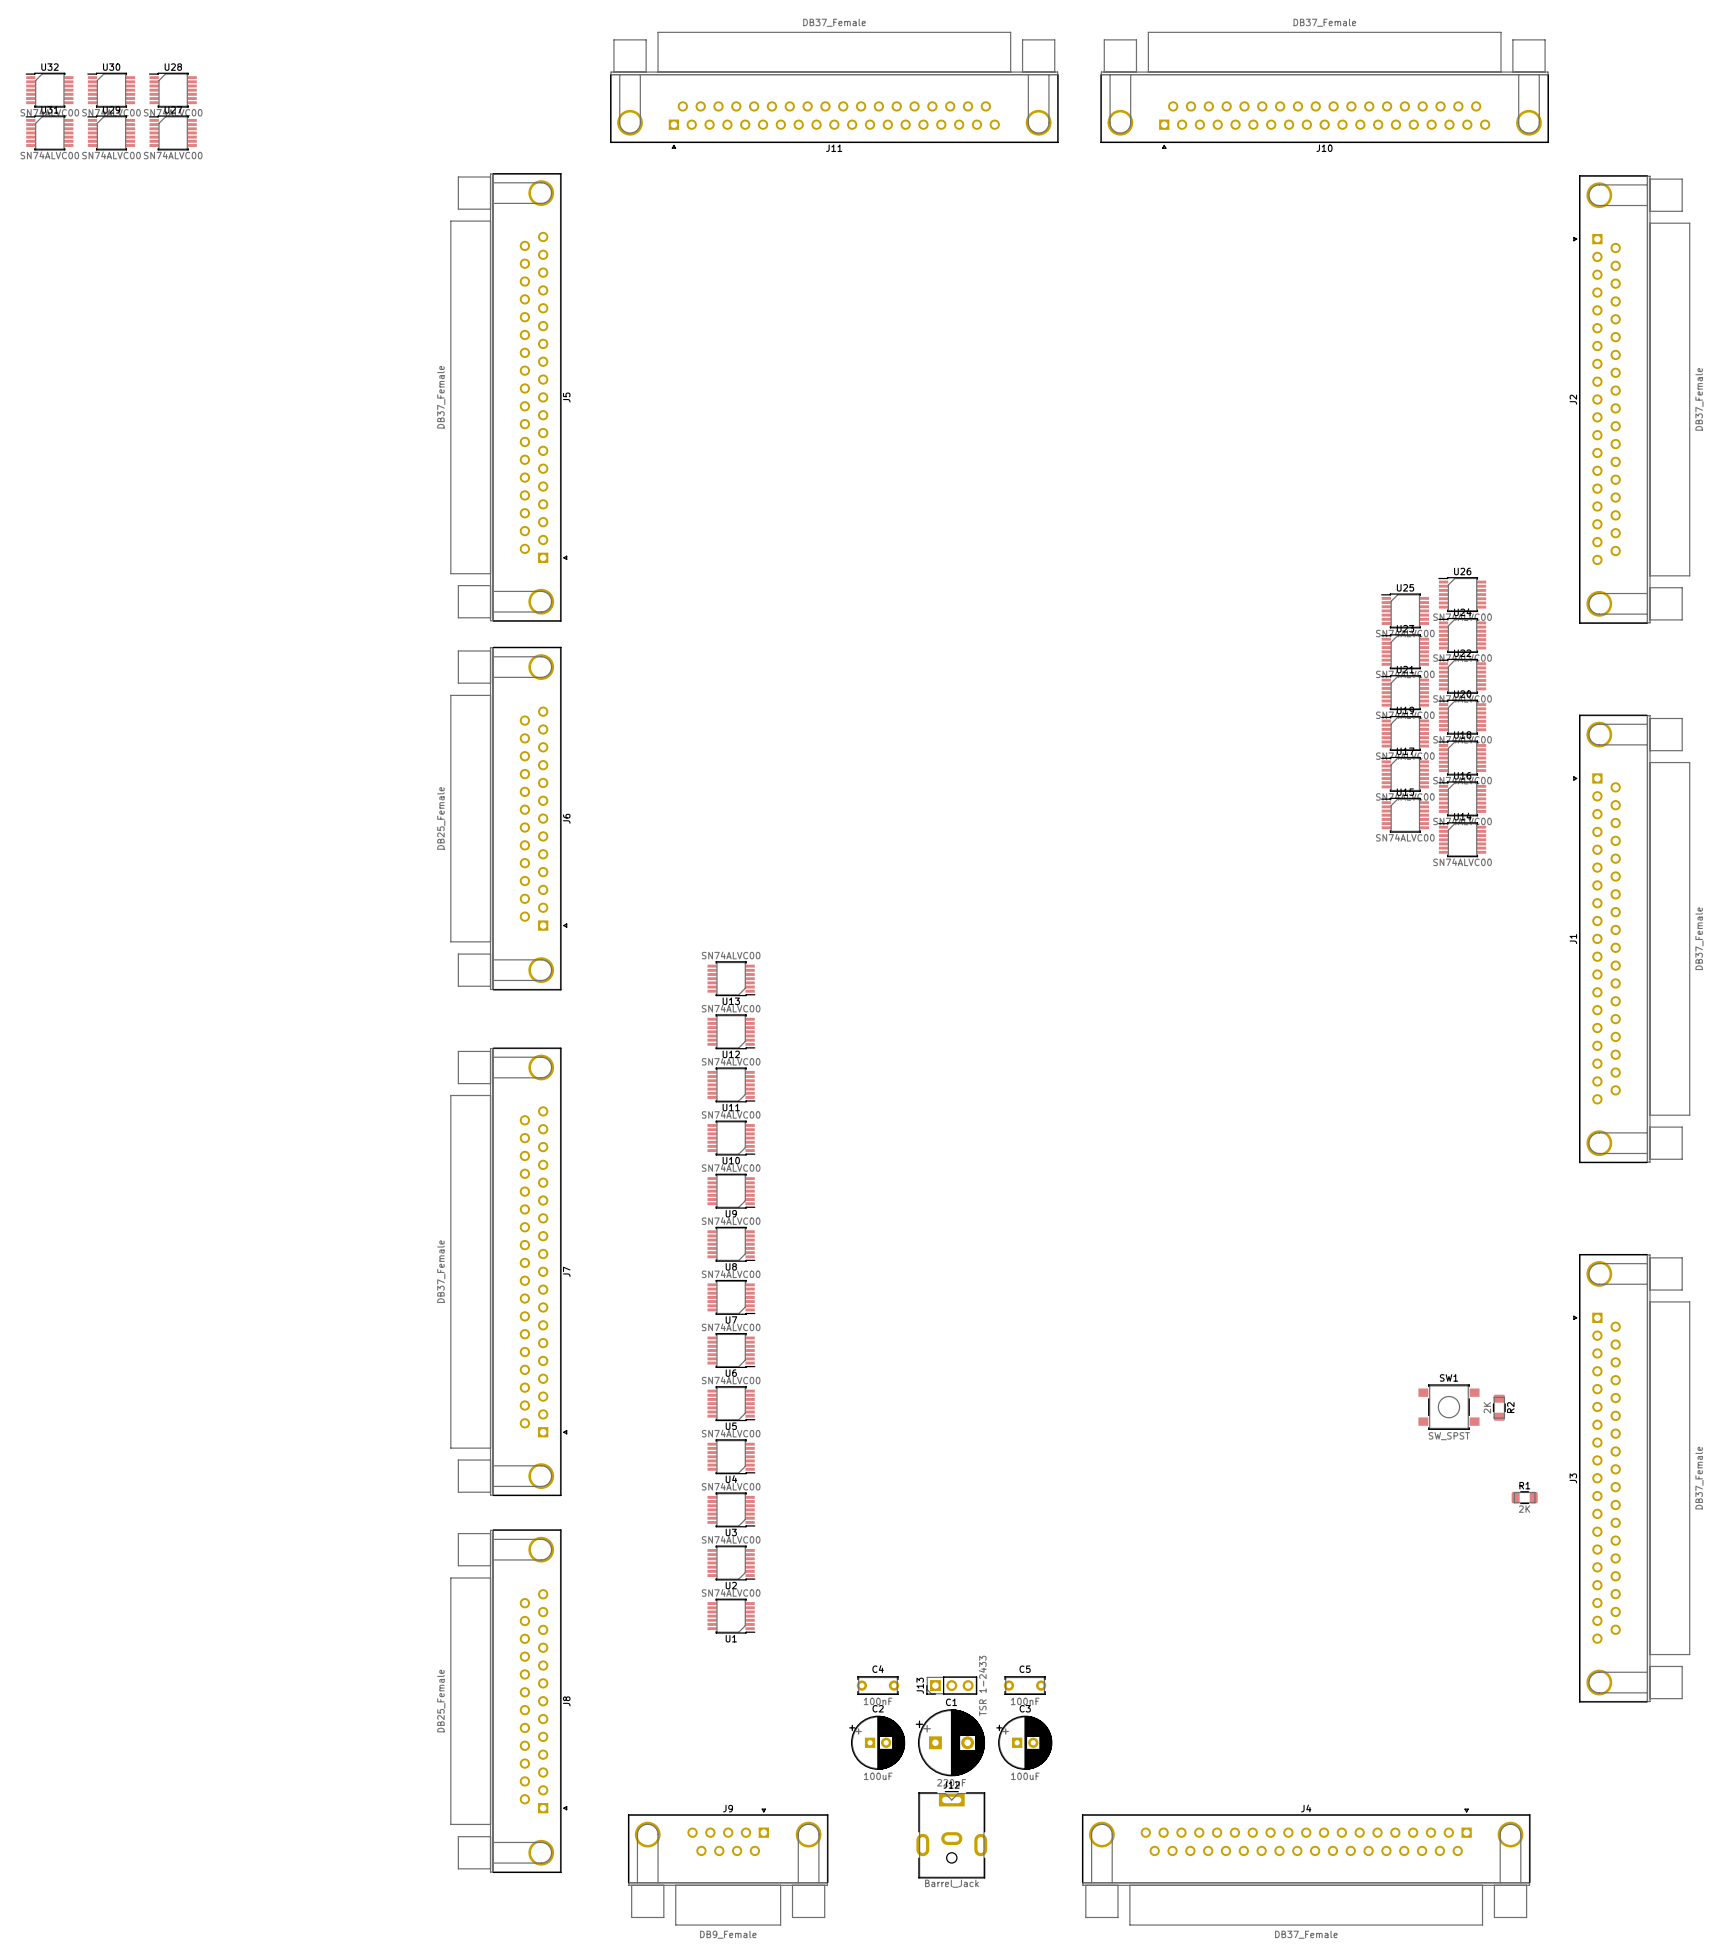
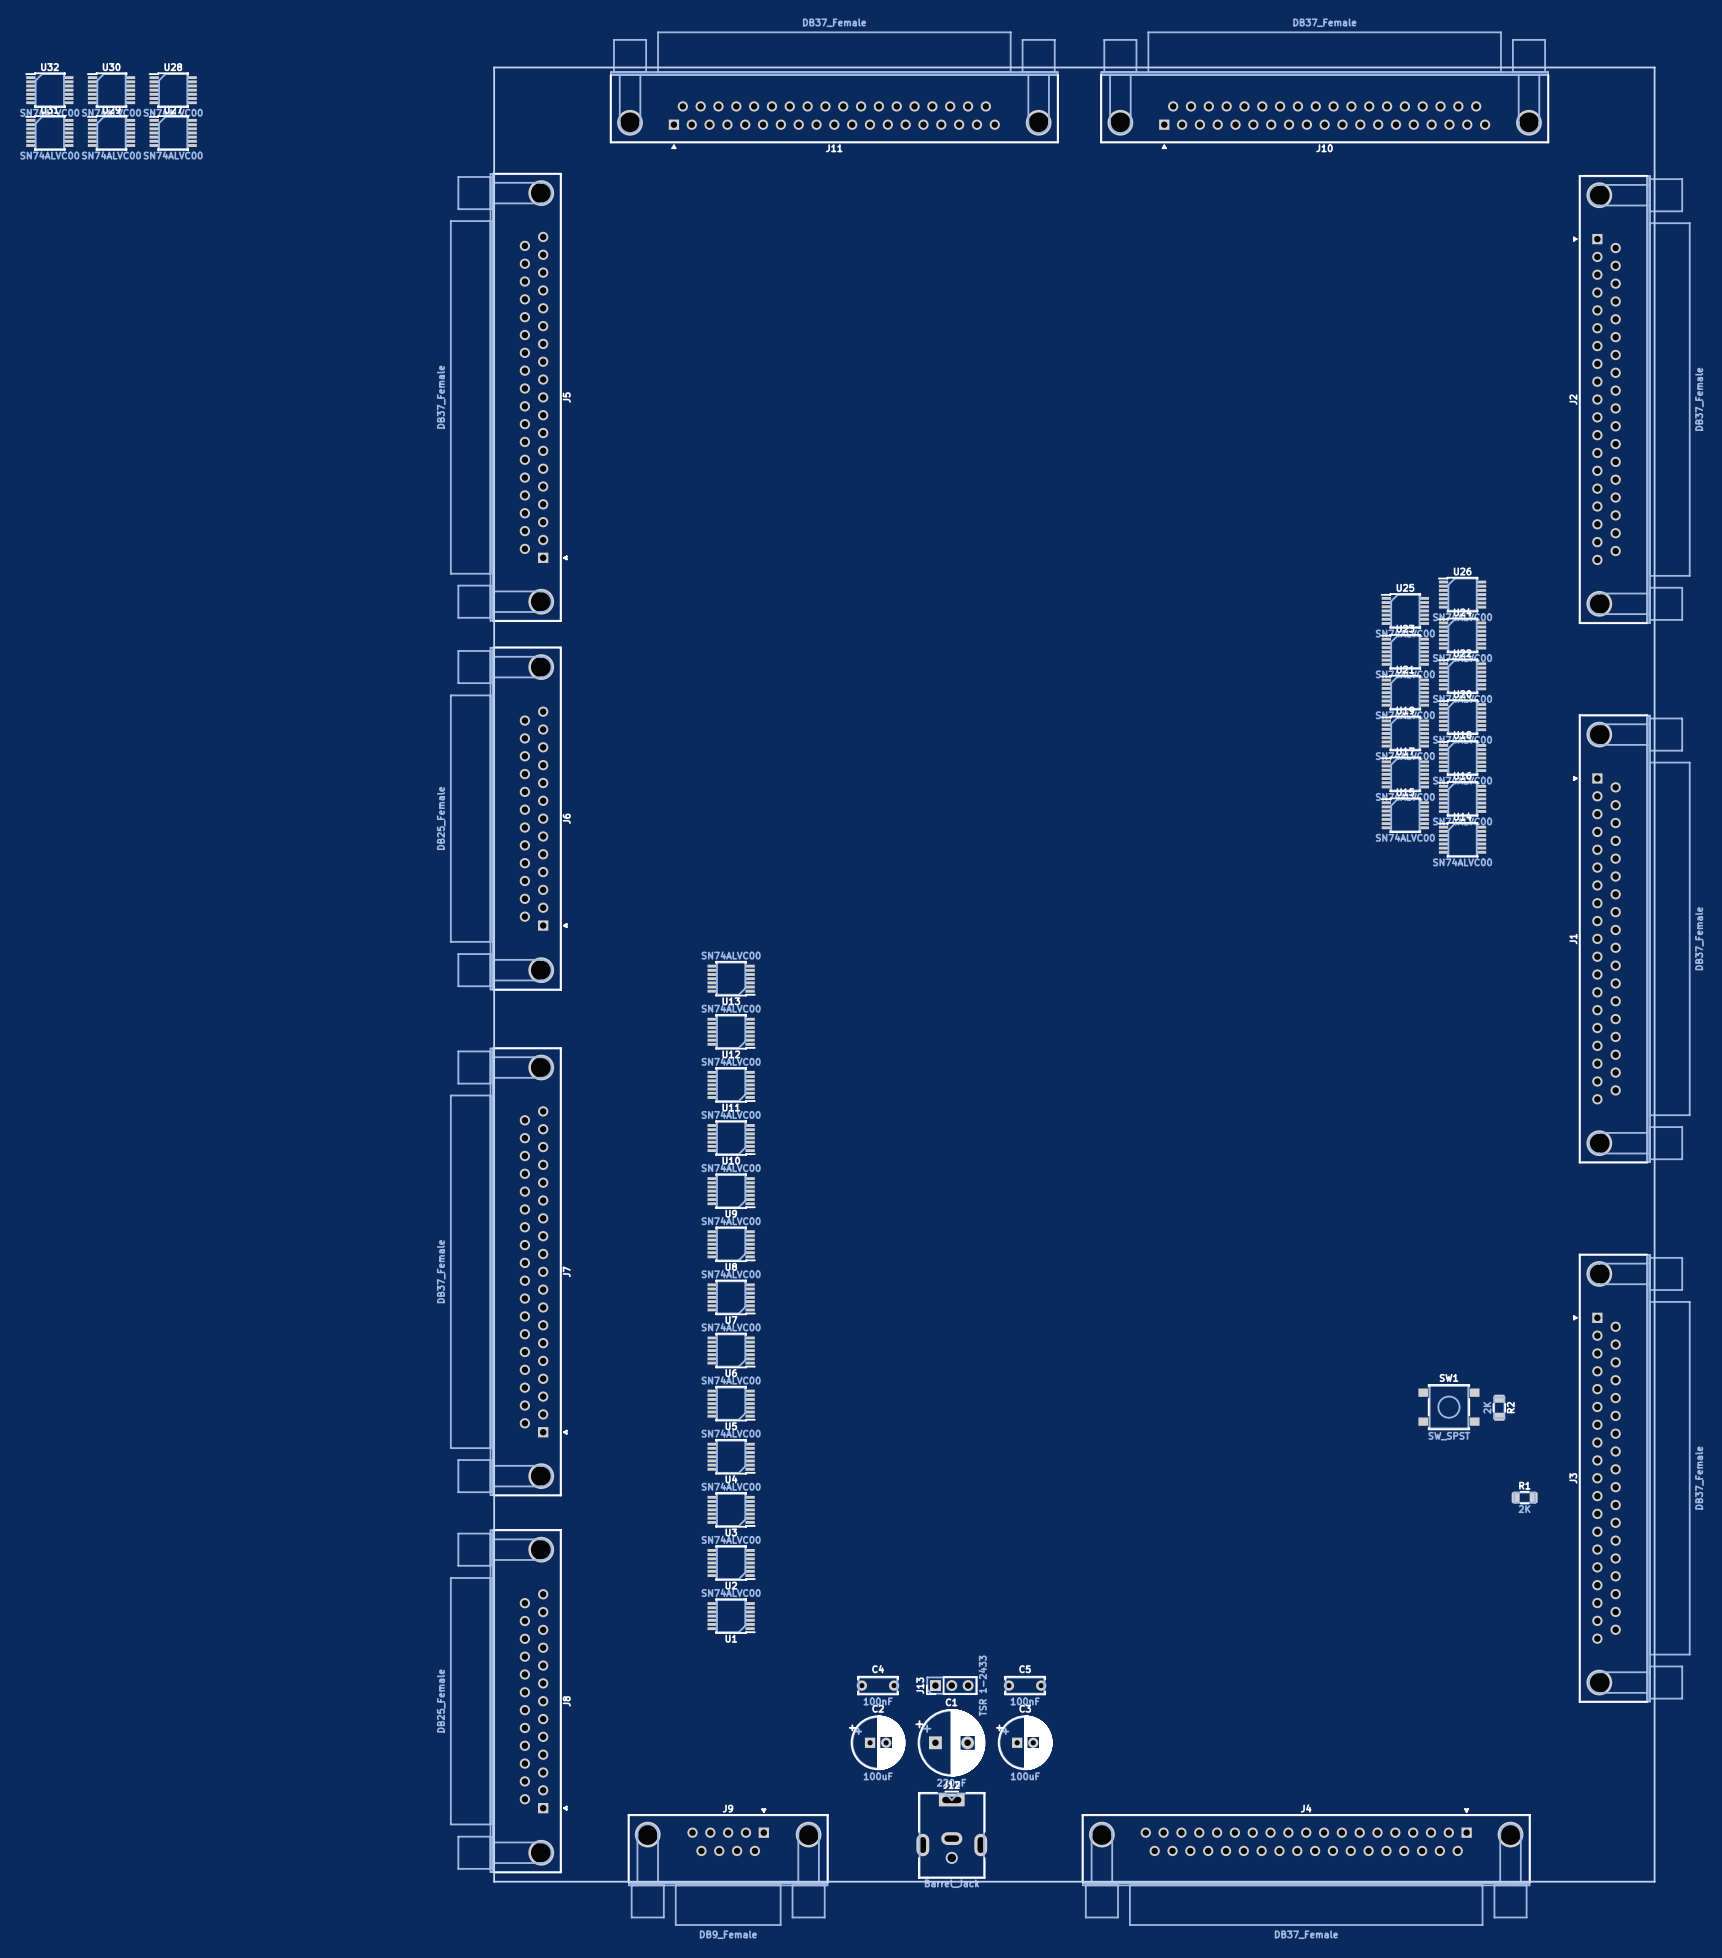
board edge: none -> (494, 67) (494, 1881) (1654, 1881) (1654, 67) (494, 67)

